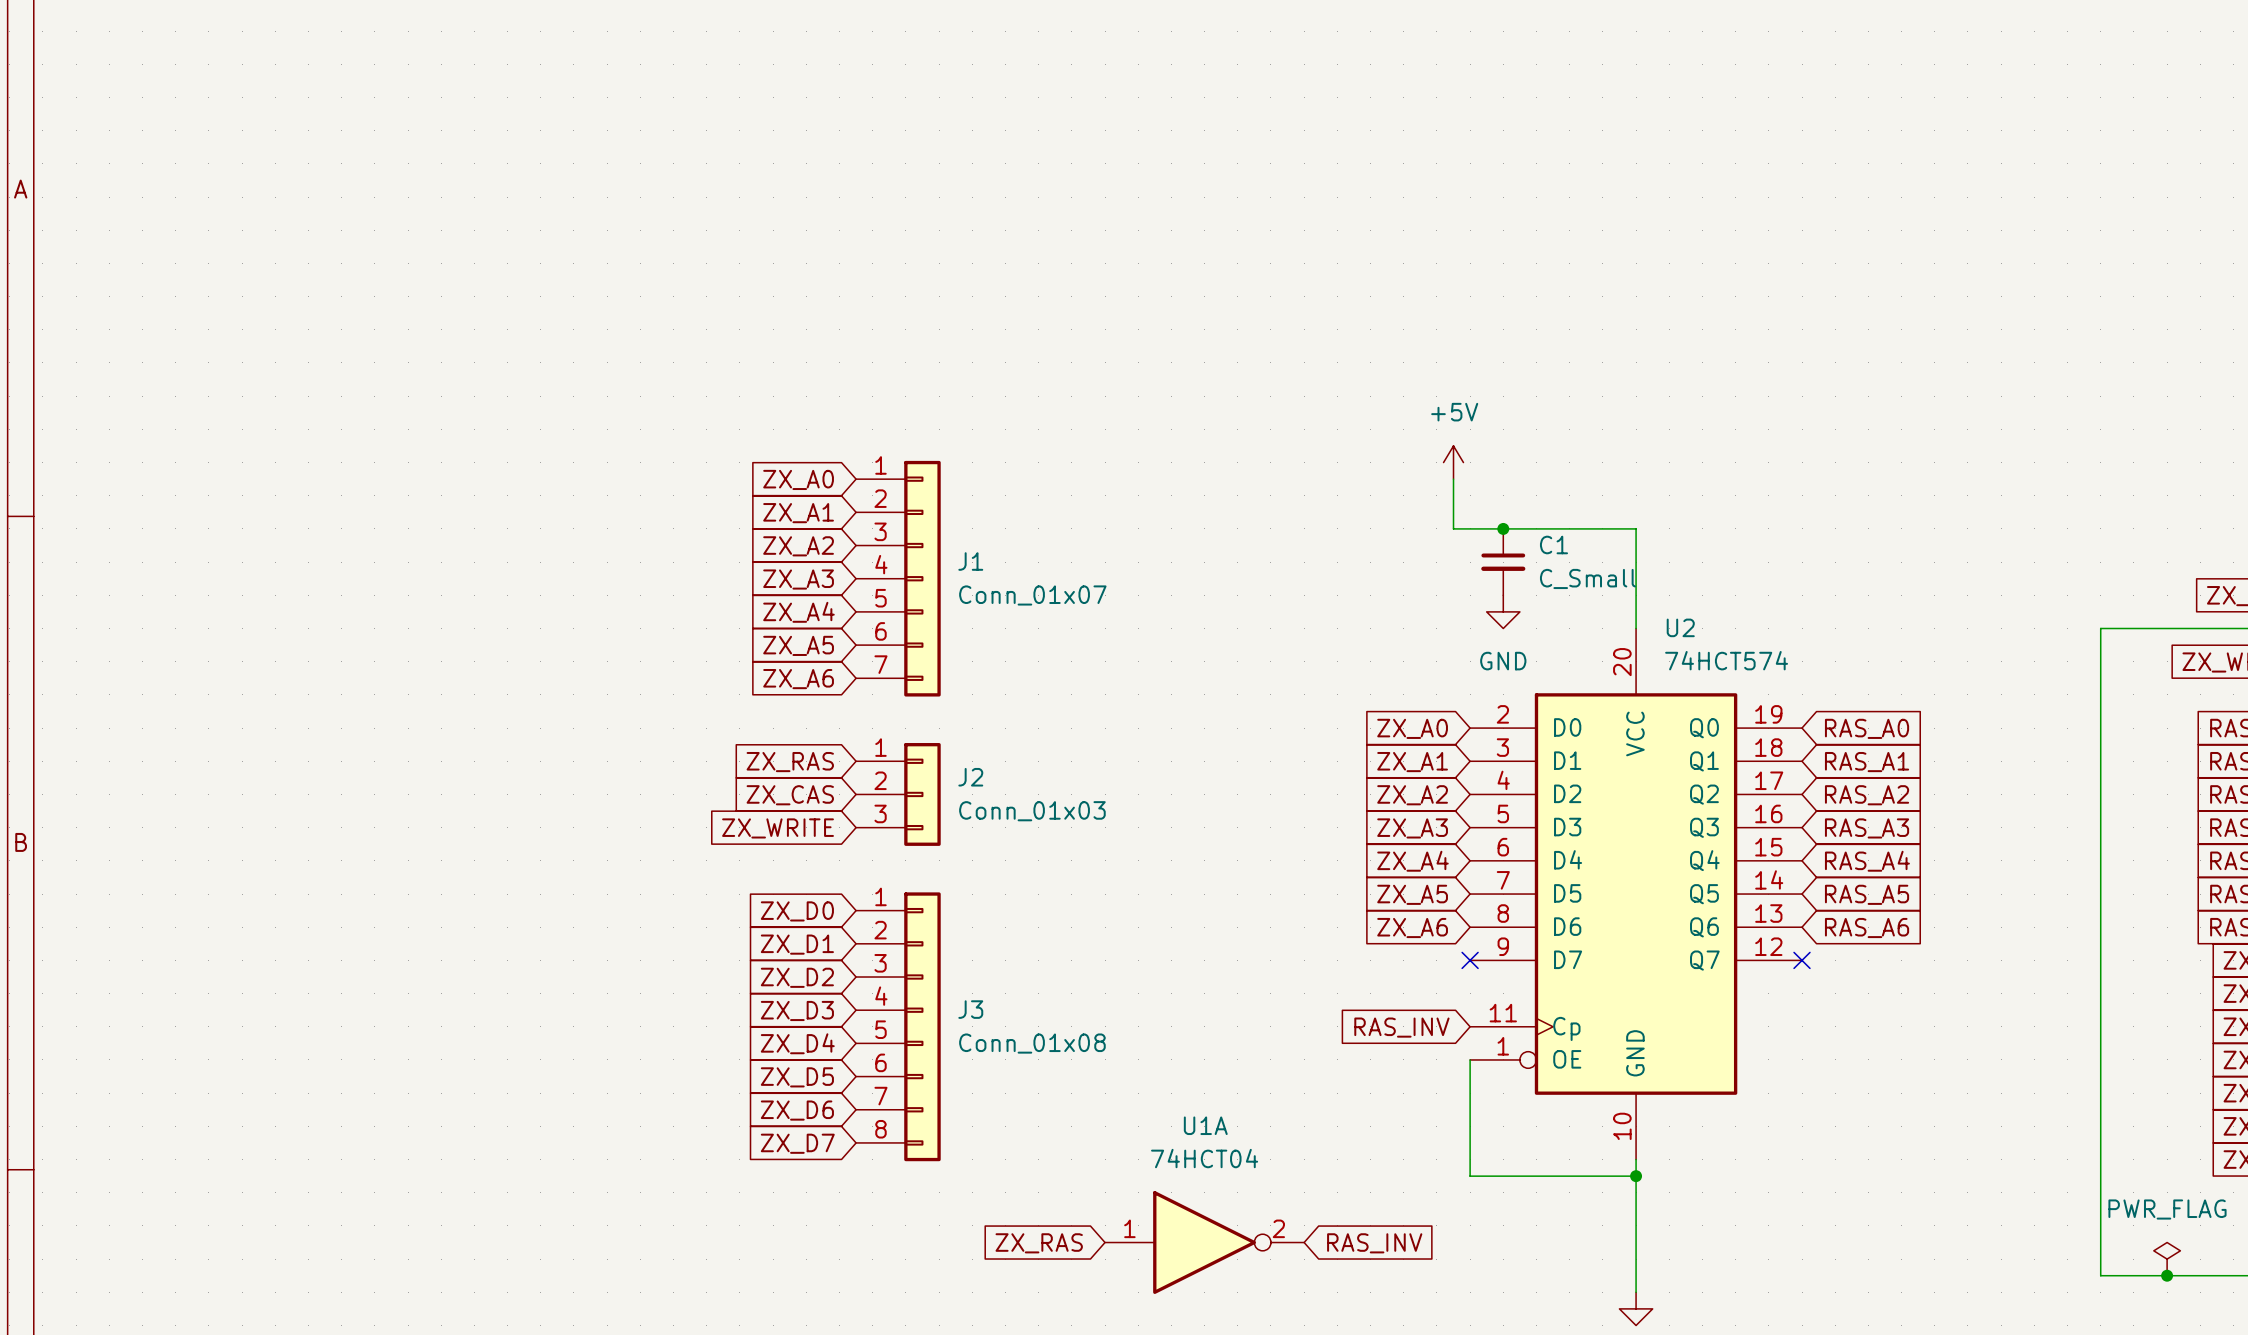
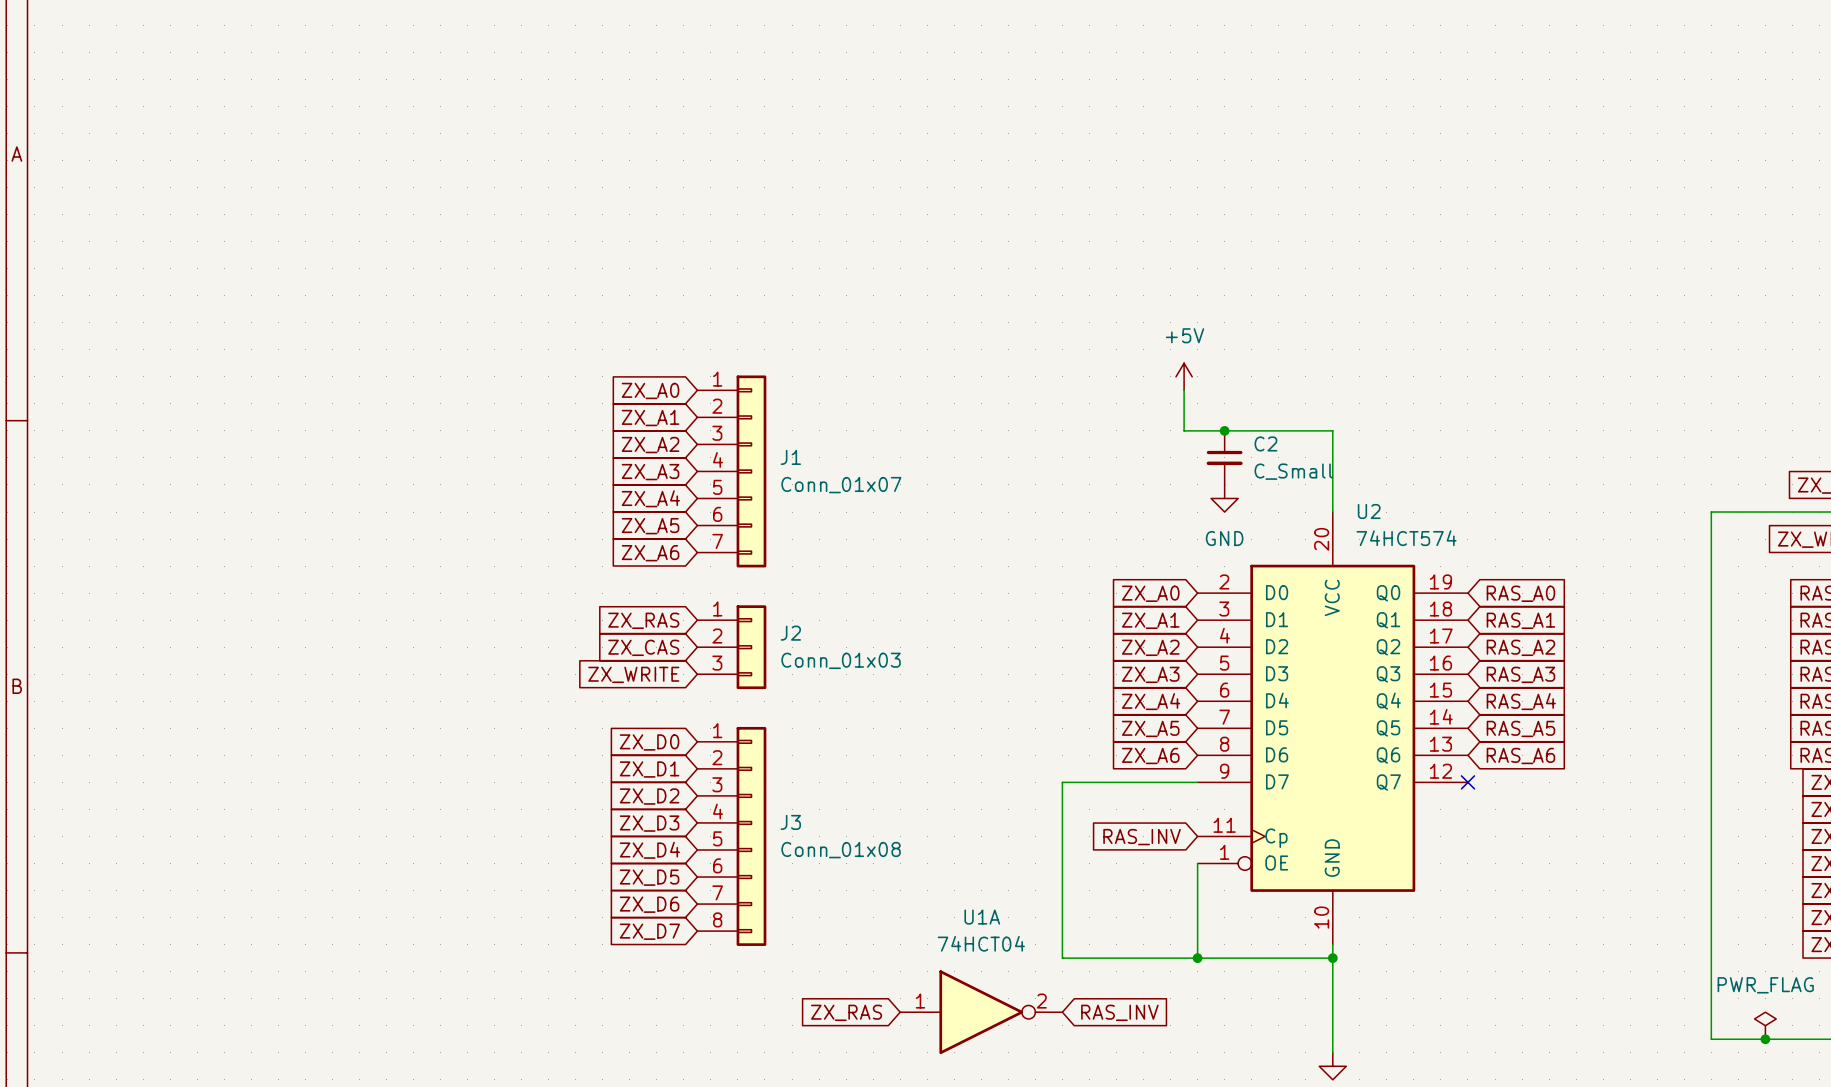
C1 name: C1 (1553, 544) -> C2 (1265, 443)
wire: none -> (1197, 782) (1062, 782) (1062, 958) (1197, 958)
no-connect mark: (1470, 960) -> none
junction: none -> (1197, 958)

